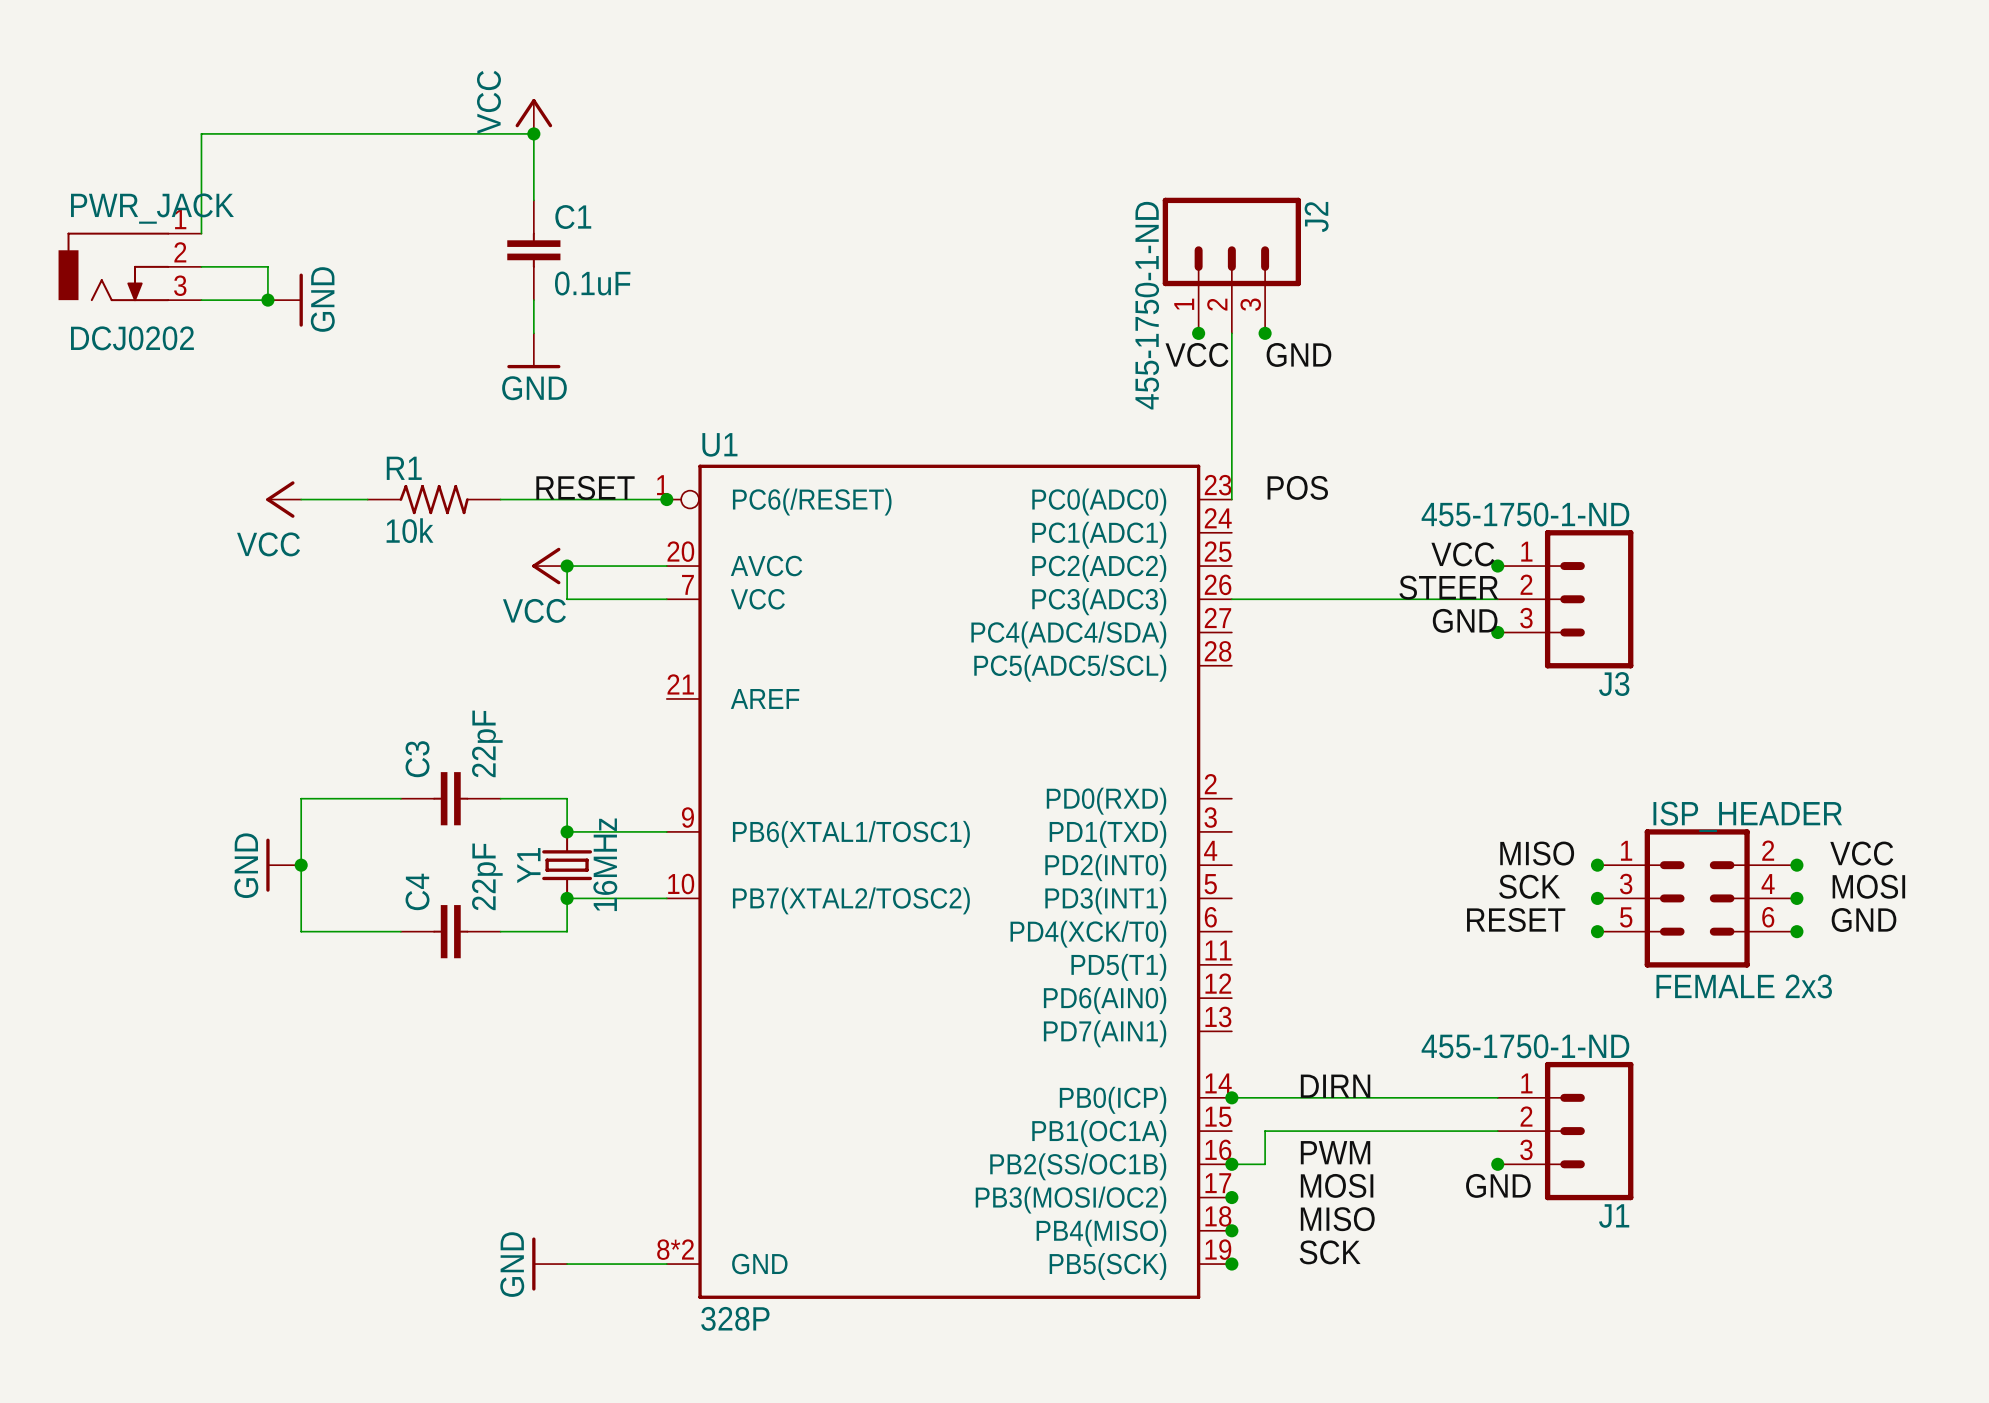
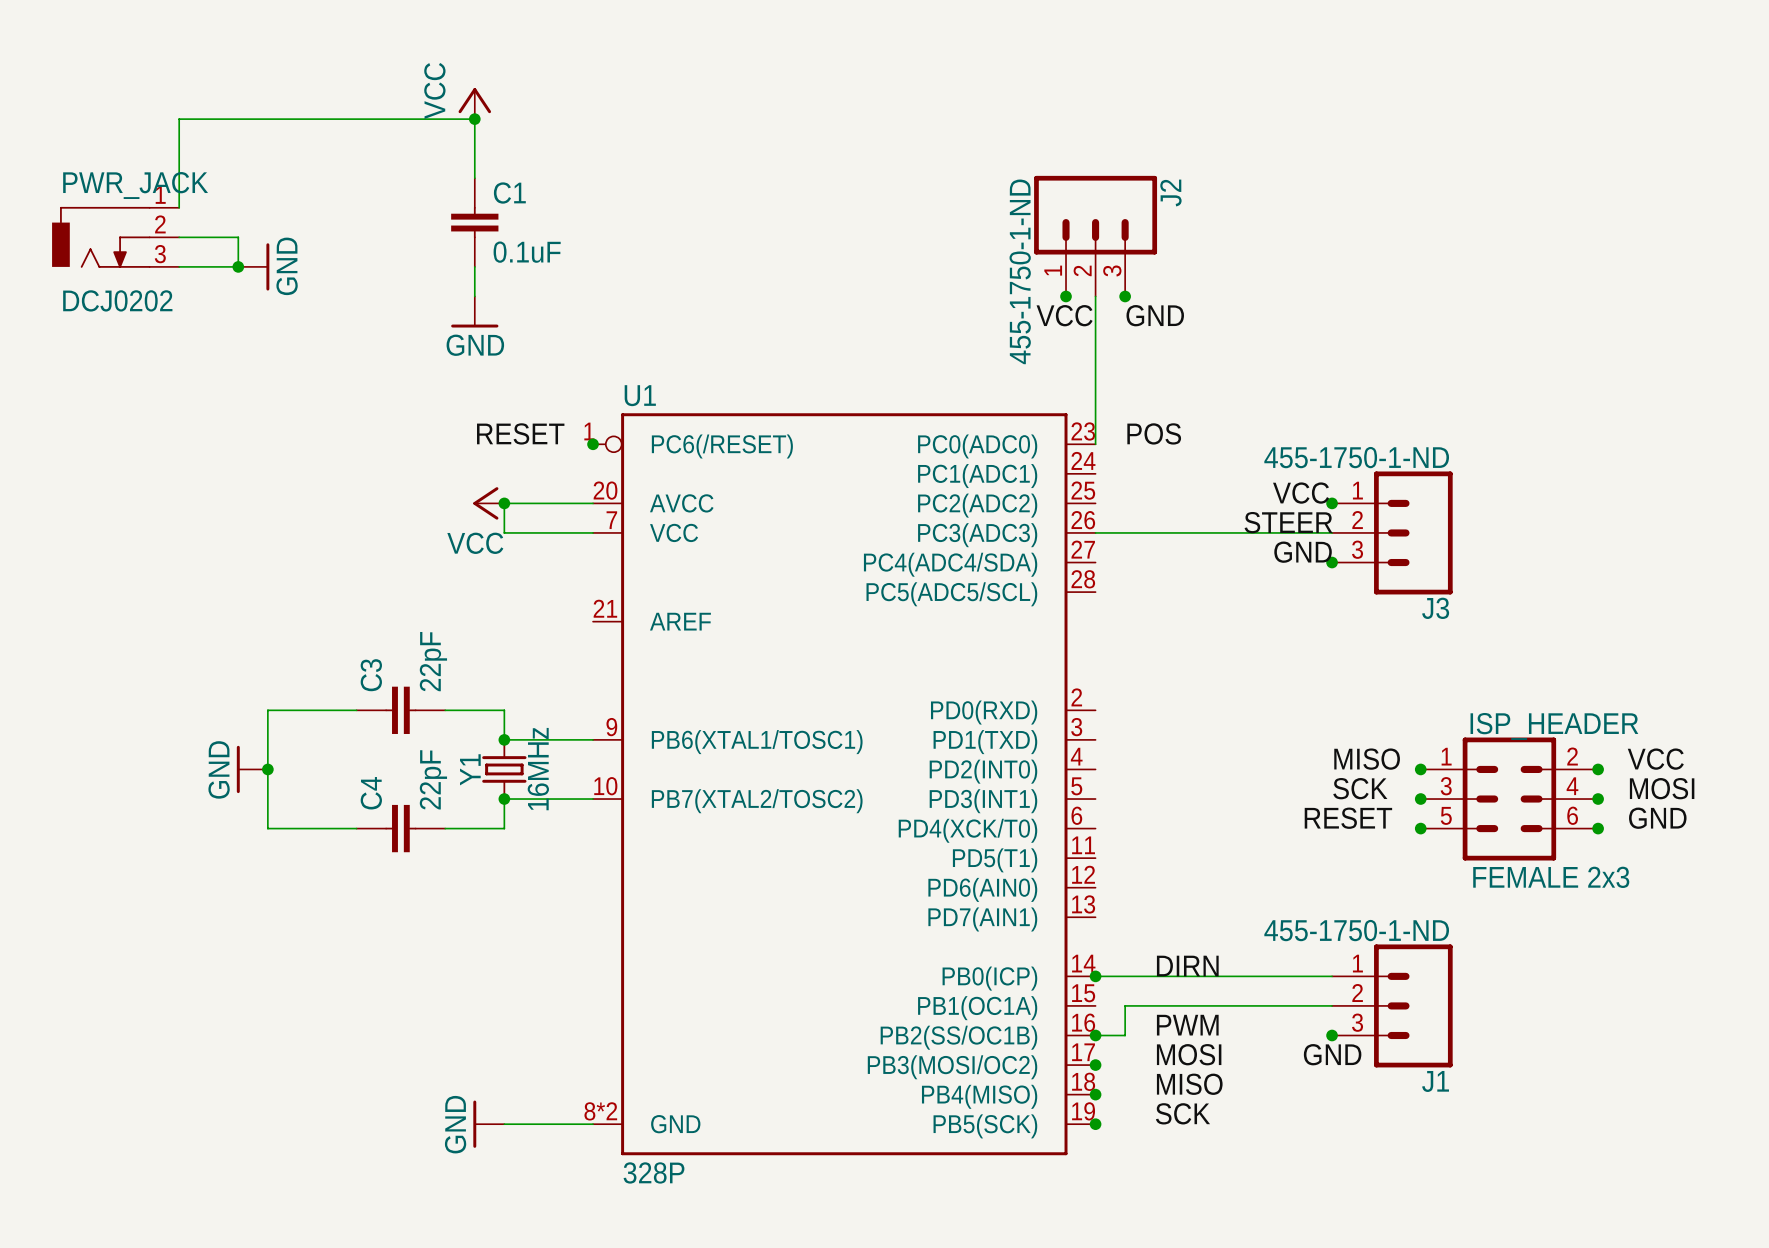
power symbol: VCC (283, 499) -> none
wire: (301, 499) (367, 499) -> none
R1: 10k (434, 499) -> none
wire: (500, 499) (666, 499) -> none

